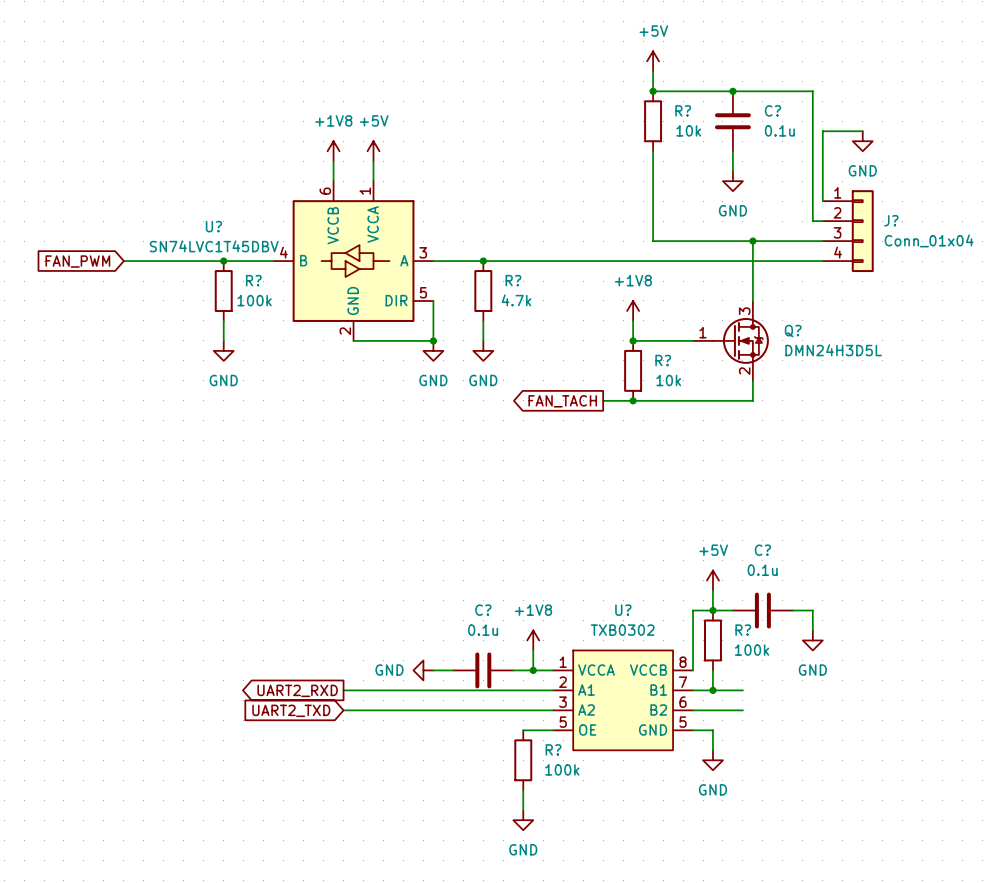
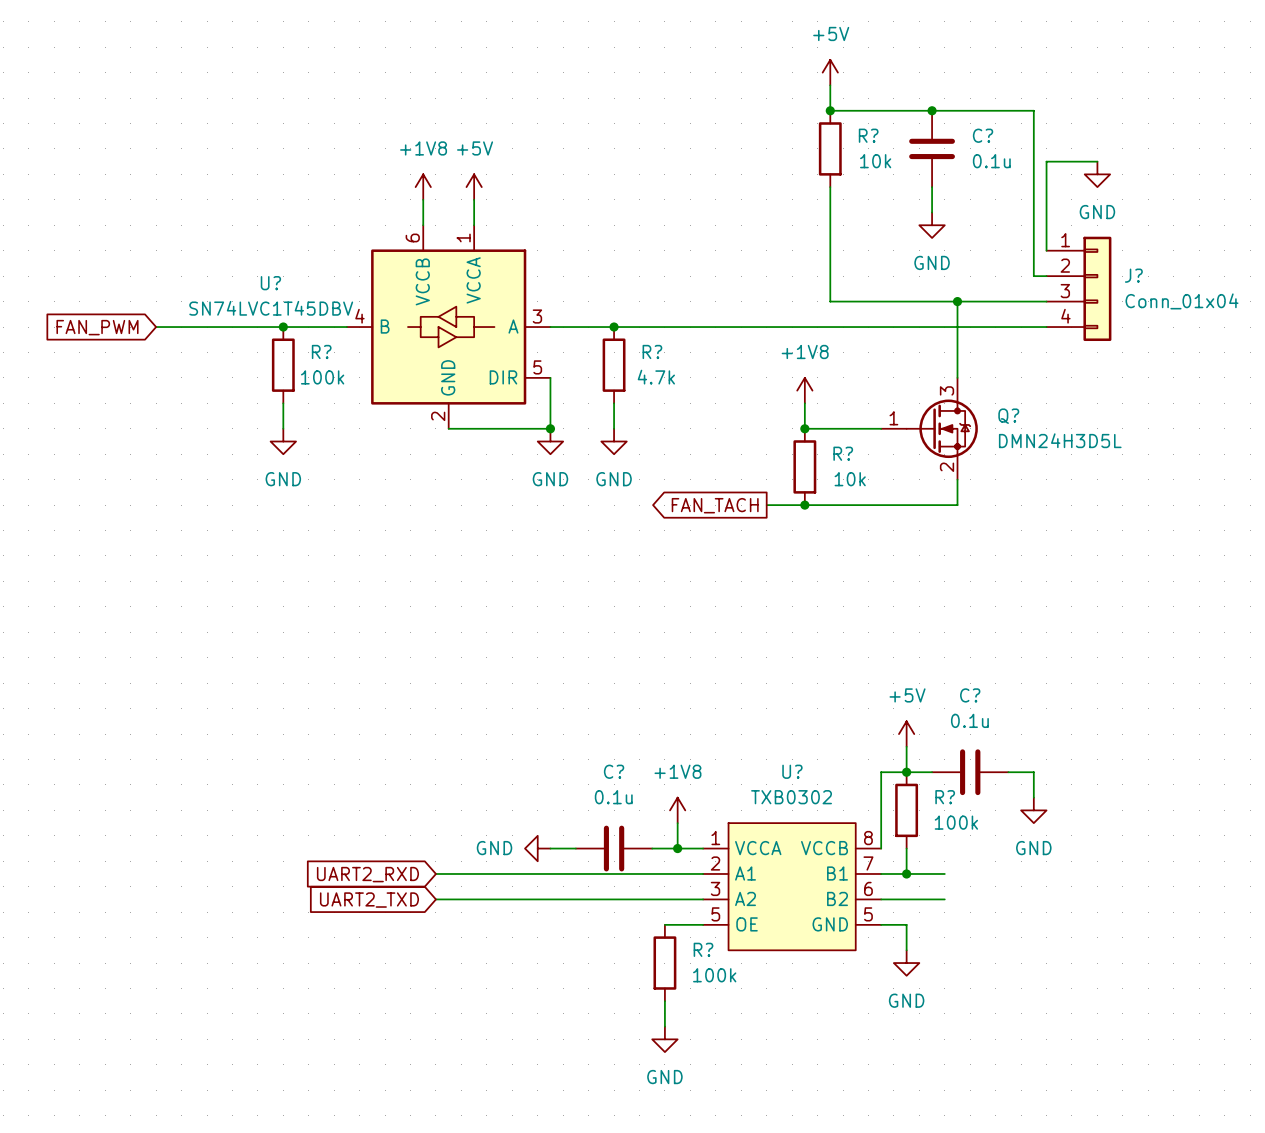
global label shape: output (297, 690) -> input (367, 874)

